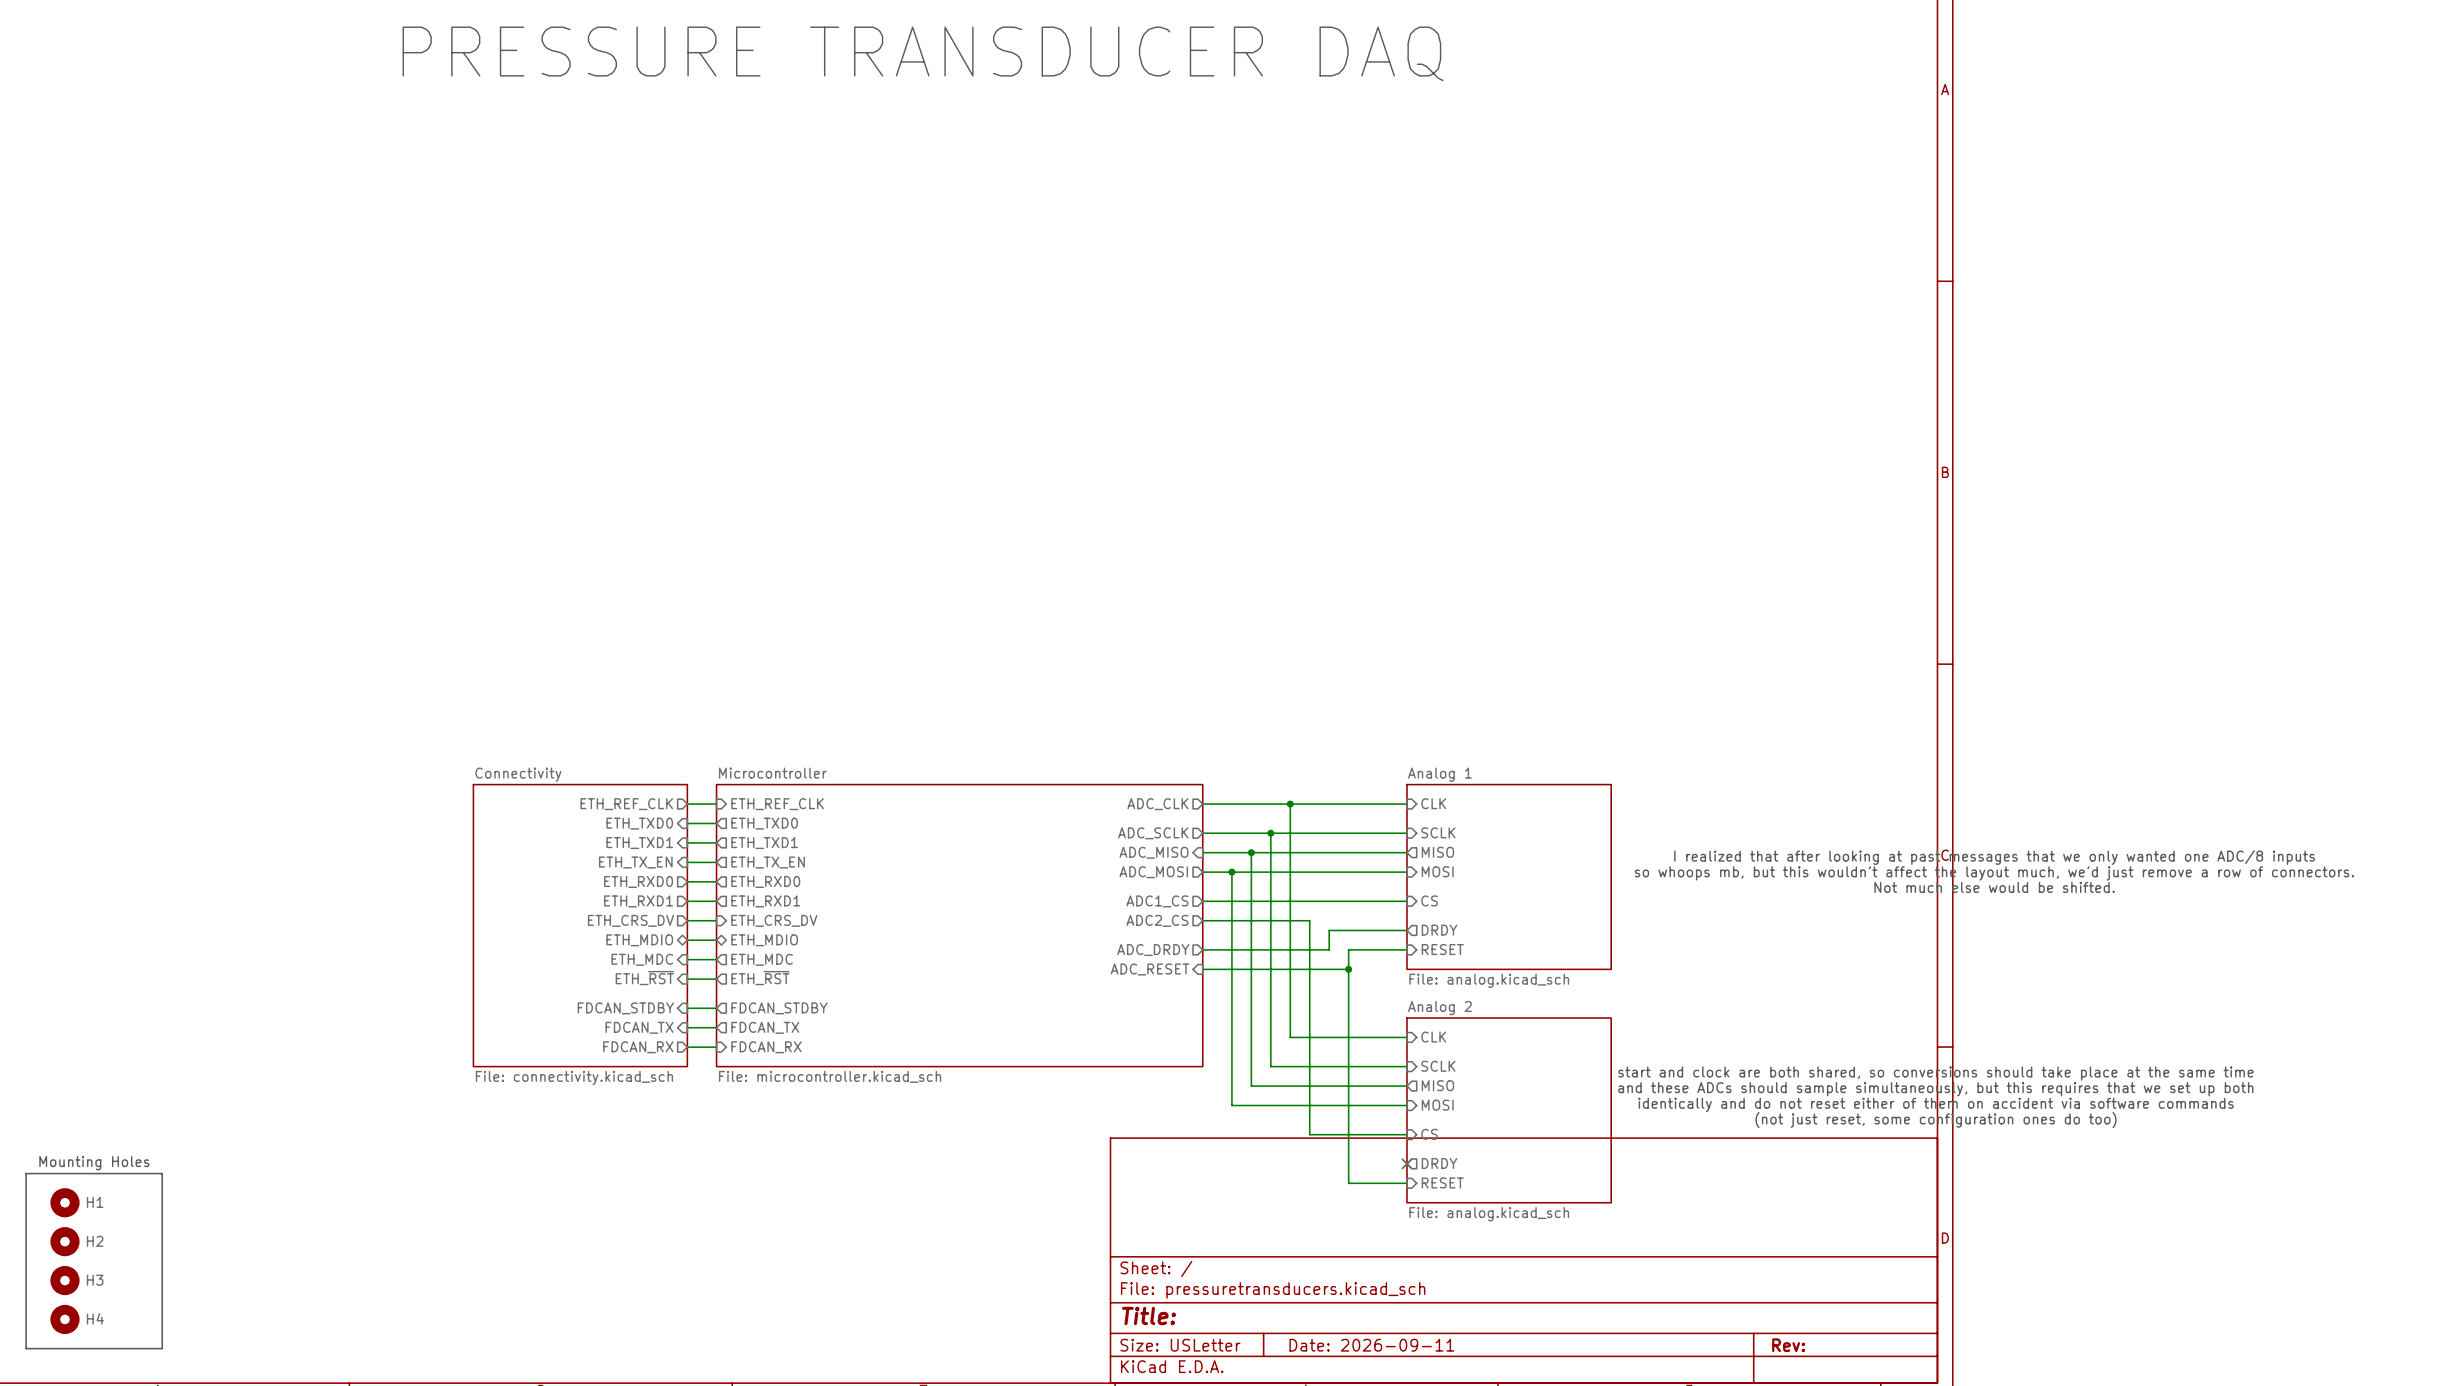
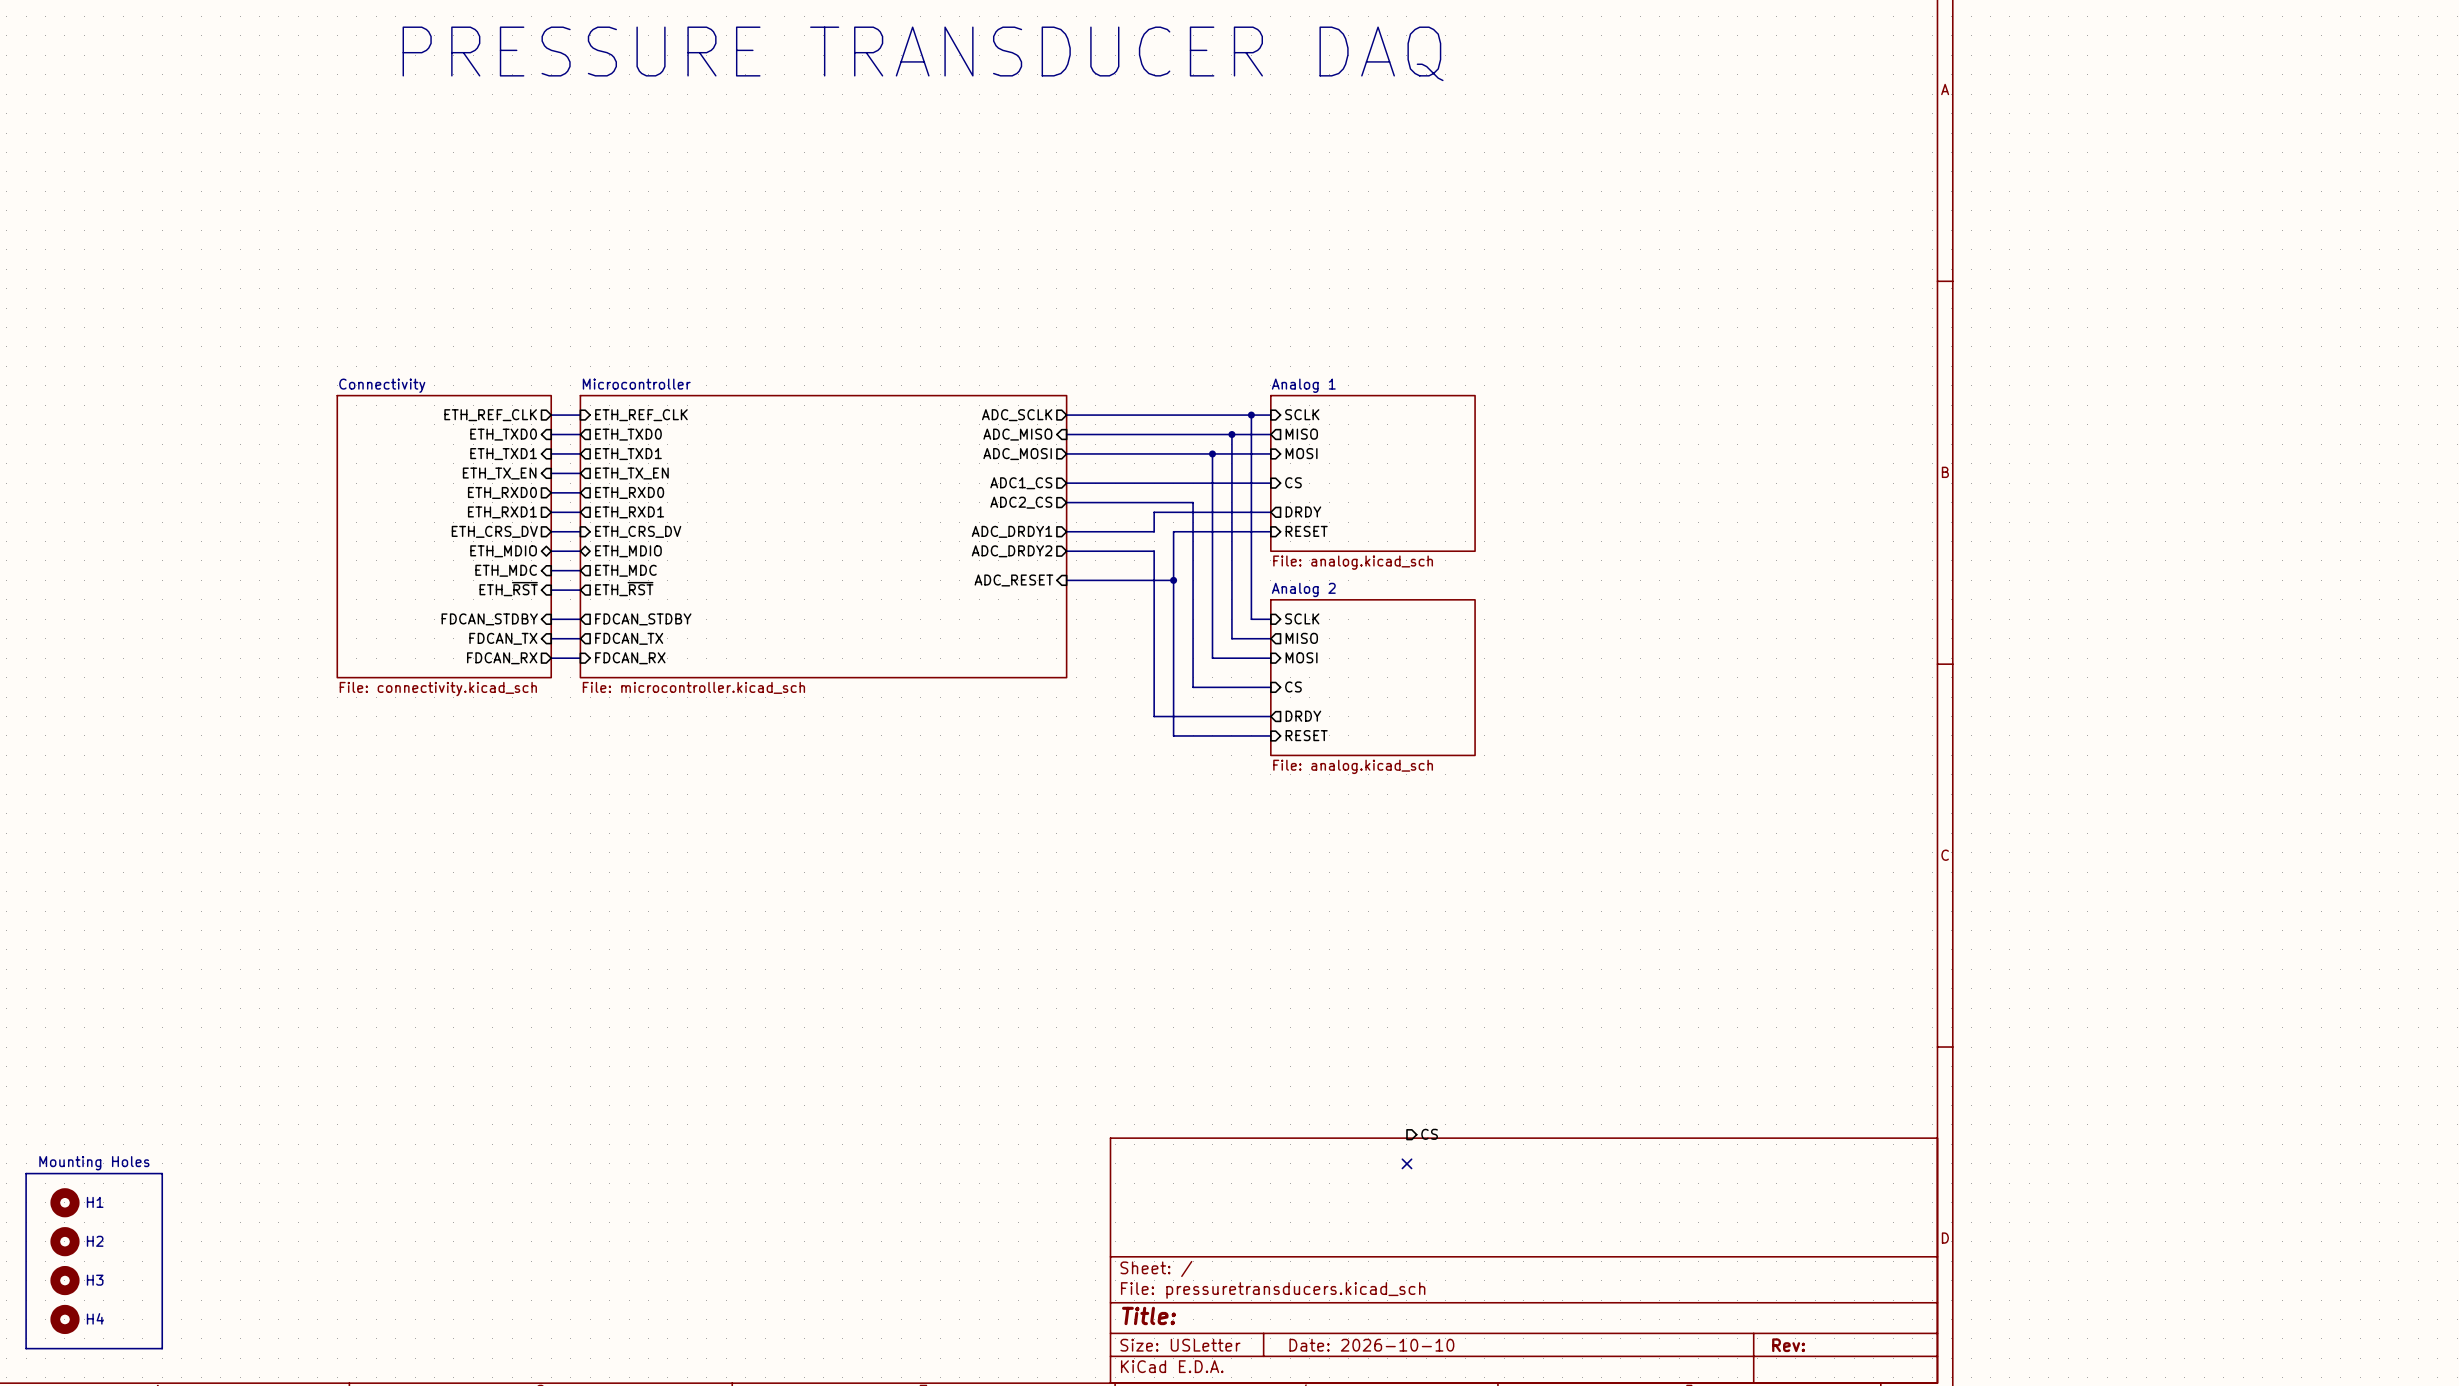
sheet pin: none -> SCLK (1302, 414)
sheet pin: none -> ETH_REF_CLK (490, 415)
wire: none -> (551, 415) (580, 415)
sheet pin: none -> ETH_REF_CLK (641, 415)
sheet pin: none -> ADC_SCLK (1017, 415)
wire: none -> (1066, 415) (1270, 415)
wire: none -> (1251, 415) (1251, 619) (1270, 619)
junction: none -> (1251, 415)
sheet pin: none -> ETH_TXD0 (503, 434)
wire: none -> (551, 434) (580, 434)
sheet pin: none -> ETH_TXD0 (628, 434)
sheet pin: none -> ADC_MISO (1017, 434)
wire: none -> (1066, 434) (1270, 434)
wire: none -> (1231, 434) (1231, 638) (1270, 638)
junction: none -> (1231, 434)
sheet pin: none -> MISO (1301, 434)
wire: none -> (551, 453) (580, 453)
wire: none -> (1066, 453) (1270, 453)
wire: none -> (1212, 453) (1212, 658) (1270, 658)
junction: none -> (1212, 453)
sheet pin: none -> MOSI (1301, 453)
sheet pin: none -> ETH_TXD1 (503, 454)
sheet pin: none -> ETH_TXD1 (628, 454)
sheet pin: none -> ADC_MOSI (1017, 454)
sheet pin: none -> ETH_TX_EN (499, 473)
wire: none -> (551, 473) (580, 473)
sheet pin: none -> ETH_TX_EN (631, 473)
sheet pin: none -> CS (1293, 482)
sheet pin: none -> ADC1_CS (1021, 483)
wire: none -> (1066, 483) (1270, 483)
sheet pin: none -> ETH_RXD0 (502, 492)
wire: none -> (551, 492) (580, 492)
sheet pin: none -> ETH_RXD0 (629, 492)
sheet pin: none -> ADC2_CS (1021, 502)
wire: none -> (1066, 502) (1193, 502) (1193, 687) (1270, 687)
sheet pin: none -> DRDY (1303, 511)
sheet pin: none -> ETH_RXD1 (502, 512)
wire: none -> (551, 512) (580, 512)
sheet pin: none -> ETH_RXD1 (629, 512)
wire: none -> (1270, 512) (1154, 512) (1154, 531) (1066, 531)
sheet pin: none -> ETH_CRS_DV (494, 531)
wire: none -> (551, 531) (580, 531)
sheet pin: none -> ETH_CRS_DV (638, 531)
sheet pin: none -> ADC_DRDY1 (1012, 531)
wire: none -> (1270, 531) (1173, 531) (1173, 735) (1270, 735)
sheet pin: none -> RESET (1306, 531)
sheet Connectivity: none -> File: connectivity.kicad_sch (444, 536)
sheet Microcontroller: none -> File: microcontroller.kicad_sch (823, 536)
sheet pin: none -> ETH_MDIO (503, 551)
wire: none -> (551, 551) (580, 551)
sheet pin: none -> ETH_MDIO (628, 551)
sheet pin: none -> ADC_DRDY2 (1012, 551)
wire: none -> (1066, 551) (1154, 551) (1154, 716) (1270, 716)
sheet pin: none -> ETH_MDC (506, 570)
wire: none -> (551, 570) (580, 570)
sheet pin: none -> ETH_MDC (625, 570)
sheet pin: none -> ADC_RESET (1013, 580)
wire: none -> (1066, 580) (1173, 580)
junction: none -> (1173, 580)
sheet pin: none -> ETH_~{RST} (508, 589)
sheet pin: none -> ETH_~{RST} (624, 589)
wire: none -> (551, 590) (580, 590)
sheet pin: none -> SCLK (1302, 618)
sheet pin: none -> FDCAN_STDBY (489, 619)
wire: none -> (551, 619) (580, 619)
sheet pin: none -> FDCAN_STDBY (643, 619)
sheet pin: none -> FDCAN_TX (503, 638)
wire: none -> (551, 638) (580, 638)
sheet pin: none -> FDCAN_TX (629, 638)
sheet pin: none -> MISO (1301, 638)
sheet pin: none -> MOSI (1301, 657)
sheet pin: none -> FDCAN_RX (502, 658)
wire: none -> (551, 658) (580, 658)
sheet pin: none -> FDCAN_RX (630, 658)
sheet pin: none -> CS (1293, 686)
sheet pin: none -> DRDY (1303, 716)
sheet pin: none -> RESET (1306, 735)
sheet Analog 1 shape: [1406, 784, 1612, 970] -> [1270, 395, 1476, 552]
sheet pin: CLK (1433, 803) -> none
sheet pin: ETH_REF_CLK (626, 804) -> none
wire: (687, 804) (716, 804) -> none
sheet pin: ETH_REF_CLK (777, 804) -> none
sheet pin: ADC_CLK (1157, 804) -> none
wire: (1202, 804) (1406, 804) -> none
wire: (1290, 804) (1290, 1037) (1406, 1037) -> none
junction: (1290, 804) -> none
sheet pin: ETH_TXD0 (639, 823) -> none
wire: (687, 823) (716, 823) -> none
sheet pin: ETH_TXD0 (764, 823) -> none
sheet pin: SCLK (1438, 832) -> none
sheet pin: ADC_SCLK (1153, 833) -> none
wire: (1202, 833) (1406, 833) -> none
wire: (1270, 833) (1270, 1066) (1406, 1066) -> none
junction: (1270, 833) -> none
wire: (687, 842) (716, 842) -> none
sheet pin: ETH_TXD1 (639, 843) -> none
sheet pin: ETH_TXD1 (764, 843) -> none
sheet pin: ADC_MISO (1153, 852) -> none
wire: (1202, 852) (1406, 852) -> none
wire: (1251, 852) (1251, 1086) (1406, 1086) -> none
junction: (1251, 852) -> none
sheet pin: MISO (1437, 852) -> none
text: I realized that after looking at past messages that we only wanted one ADC/8 inputs (1994, 857) -> none
sheet pin: ETH_TX_EN (635, 862) -> none
wire: (687, 862) (716, 862) -> none
sheet pin: ETH_TX_EN (768, 862) -> none
sheet pin: MOSI (1437, 871) -> none
sheet pin: ADC_MOSI (1153, 872) -> none
wire: (1202, 872) (1406, 872) -> none
wire: (1231, 872) (1231, 1105) (1406, 1105) -> none
junction: (1231, 872) -> none
text: so whoops mb, but this wouldn't affect the layout much, we'd just remove a row of connectors. (1994, 873) -> none
sheet pin: ETH_RXD0 (638, 881) -> none
wire: (687, 881) (716, 881) -> none
sheet pin: ETH_RXD0 (765, 881) -> none
text: Not much else would be shifted. (1994, 887) -> none
sheet pin: CS (1429, 900) -> none
sheet pin: ETH_RXD1 (638, 901) -> none
wire: (687, 901) (716, 901) -> none
sheet pin: ETH_RXD1 (765, 901) -> none
sheet pin: ADC1_CS (1157, 901) -> none
wire: (1202, 901) (1406, 901) -> none
sheet pin: ETH_CRS_DV (630, 920) -> none
wire: (687, 920) (716, 920) -> none
sheet pin: ETH_CRS_DV (774, 920) -> none
sheet pin: ADC2_CS (1157, 920) -> none
wire: (1202, 920) (1309, 920) (1309, 1134) (1406, 1134) -> none
sheet Connectivity: File: connectivity.kicad_sch (580, 925) -> none
sheet Microcontroller: File: microcontroller.kicad_sch (959, 925) -> none
wire: (1406, 930) (1329, 930) (1329, 949) (1202, 949) -> none
sheet pin: DRDY (1439, 930) -> none
sheet pin: ETH_MDIO (639, 940) -> none
wire: (687, 940) (716, 940) -> none
sheet pin: ETH_MDIO (764, 940) -> none
wire: (1406, 949) (1348, 949) (1348, 1183) (1406, 1183) -> none
sheet pin: RESET (1442, 949) -> none
sheet pin: ADC_DRDY (1153, 950) -> none
sheet pin: ETH_MDC (642, 959) -> none
wire: (687, 959) (716, 959) -> none
sheet pin: ETH_MDC (762, 959) -> none
sheet pin: ADC_RESET (1150, 969) -> none
wire: (1202, 969) (1348, 969) -> none
junction: (1348, 969) -> none
sheet pin: ETH_~{RST} (644, 978) -> none
sheet pin: ETH_~{RST} (760, 978) -> none
wire: (687, 979) (716, 979) -> none
sheet pin: FDCAN_STDBY (625, 1008) -> none
wire: (687, 1008) (716, 1008) -> none
sheet pin: FDCAN_STDBY (779, 1008) -> none
sheet Analog 2 shape: [1406, 1017, 1612, 1204] -> [1270, 599, 1476, 757]
sheet pin: FDCAN_TX (639, 1027) -> none
wire: (687, 1027) (716, 1027) -> none
sheet pin: FDCAN_TX (765, 1027) -> none
sheet pin: CLK (1433, 1037) -> none
sheet pin: FDCAN_RX (638, 1047) -> none
wire: (687, 1047) (716, 1047) -> none
sheet pin: FDCAN_RX (766, 1047) -> none
sheet pin: SCLK (1438, 1066) -> none
text: start and clock are both shared, so conversions should take place at the same time (1936, 1073) -> none
sheet pin: MISO (1437, 1085) -> none
text: and these ADCs should sample simultaneously, but this requires that we set up both (1935, 1089) -> none
text: identically and do not reset either of them on accident via software commands (1936, 1104) -> none
sheet pin: MOSI (1437, 1105) -> none
text: (not just reset, some configuration ones do too) (1936, 1120) -> none
sheet pin: DRDY (1439, 1163) -> none
sheet pin: RESET (1442, 1182) -> none
title block: Date: 2026-09-11 (1371, 1345) -> Date: 2026-10-10 (1371, 1345)

